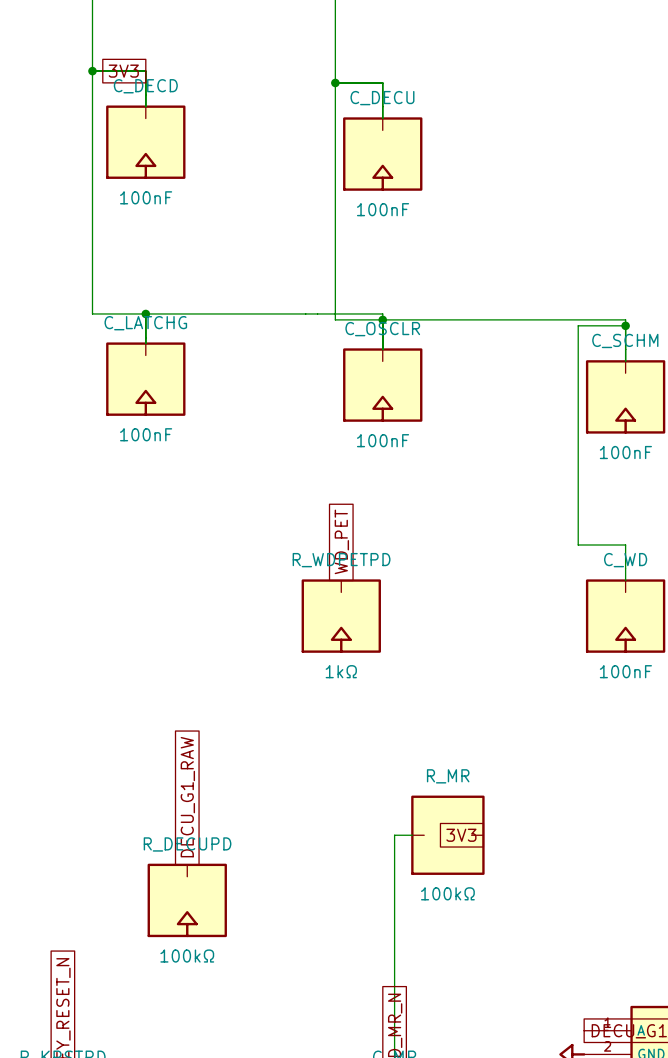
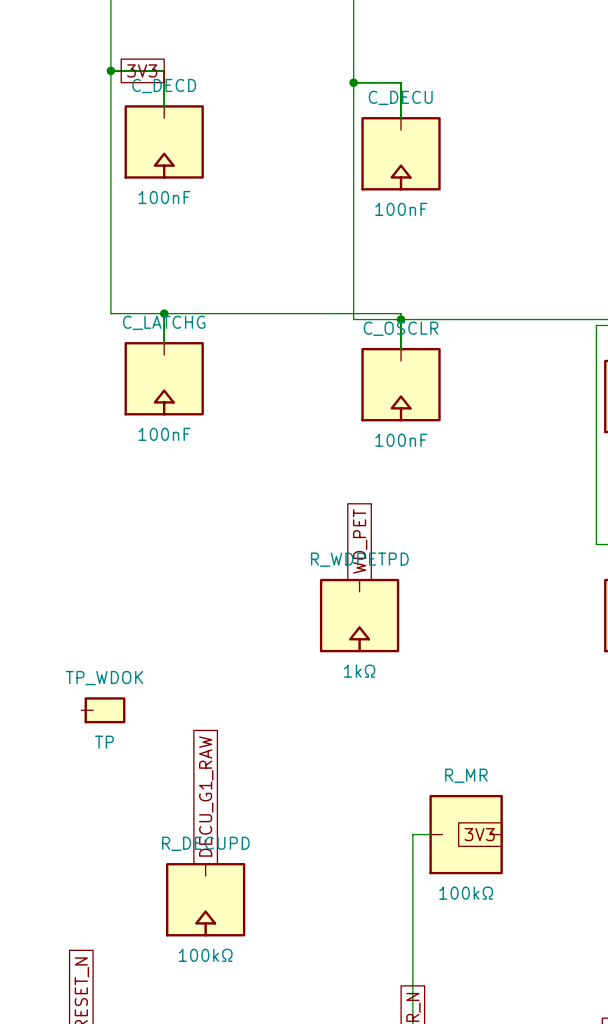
TP_WDOK: none -> TP (103, 710)

